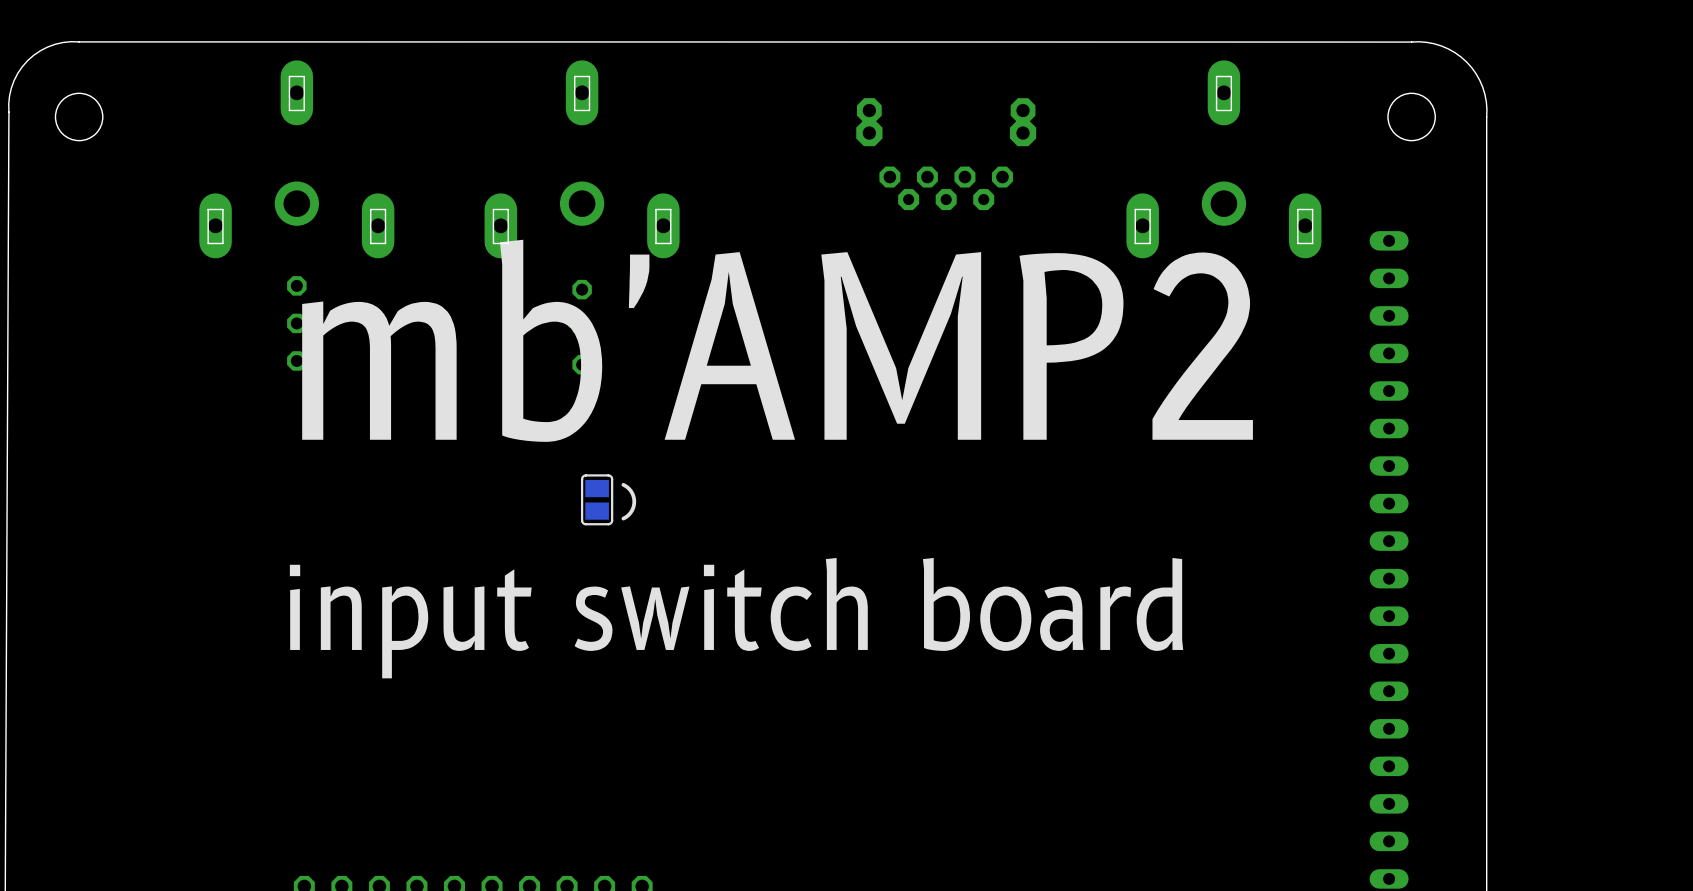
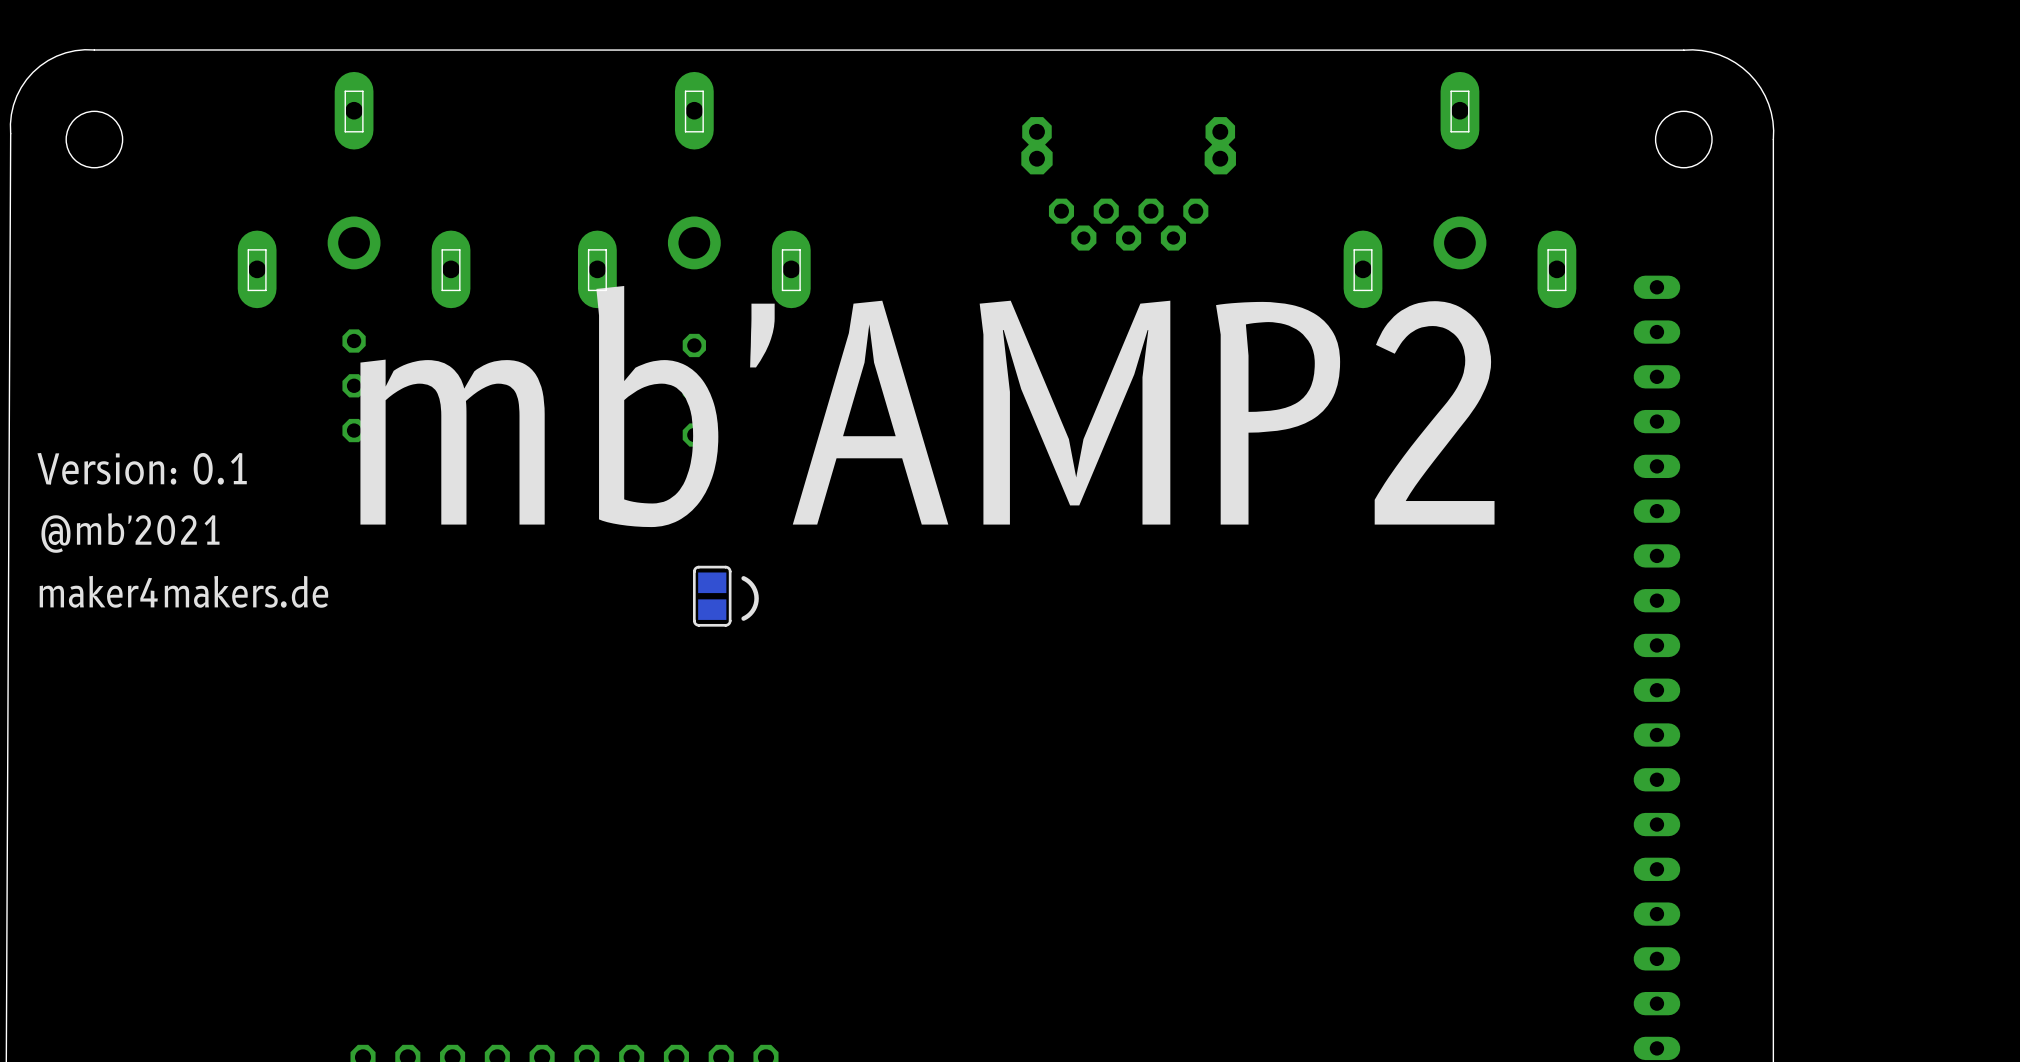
text: none -> Version: 0.1 (142, 468)
text: none -> @mb'2021 (130, 533)
text: none -> maker4makers.de (183, 591)
text: input switch board (736, 618) -> none

